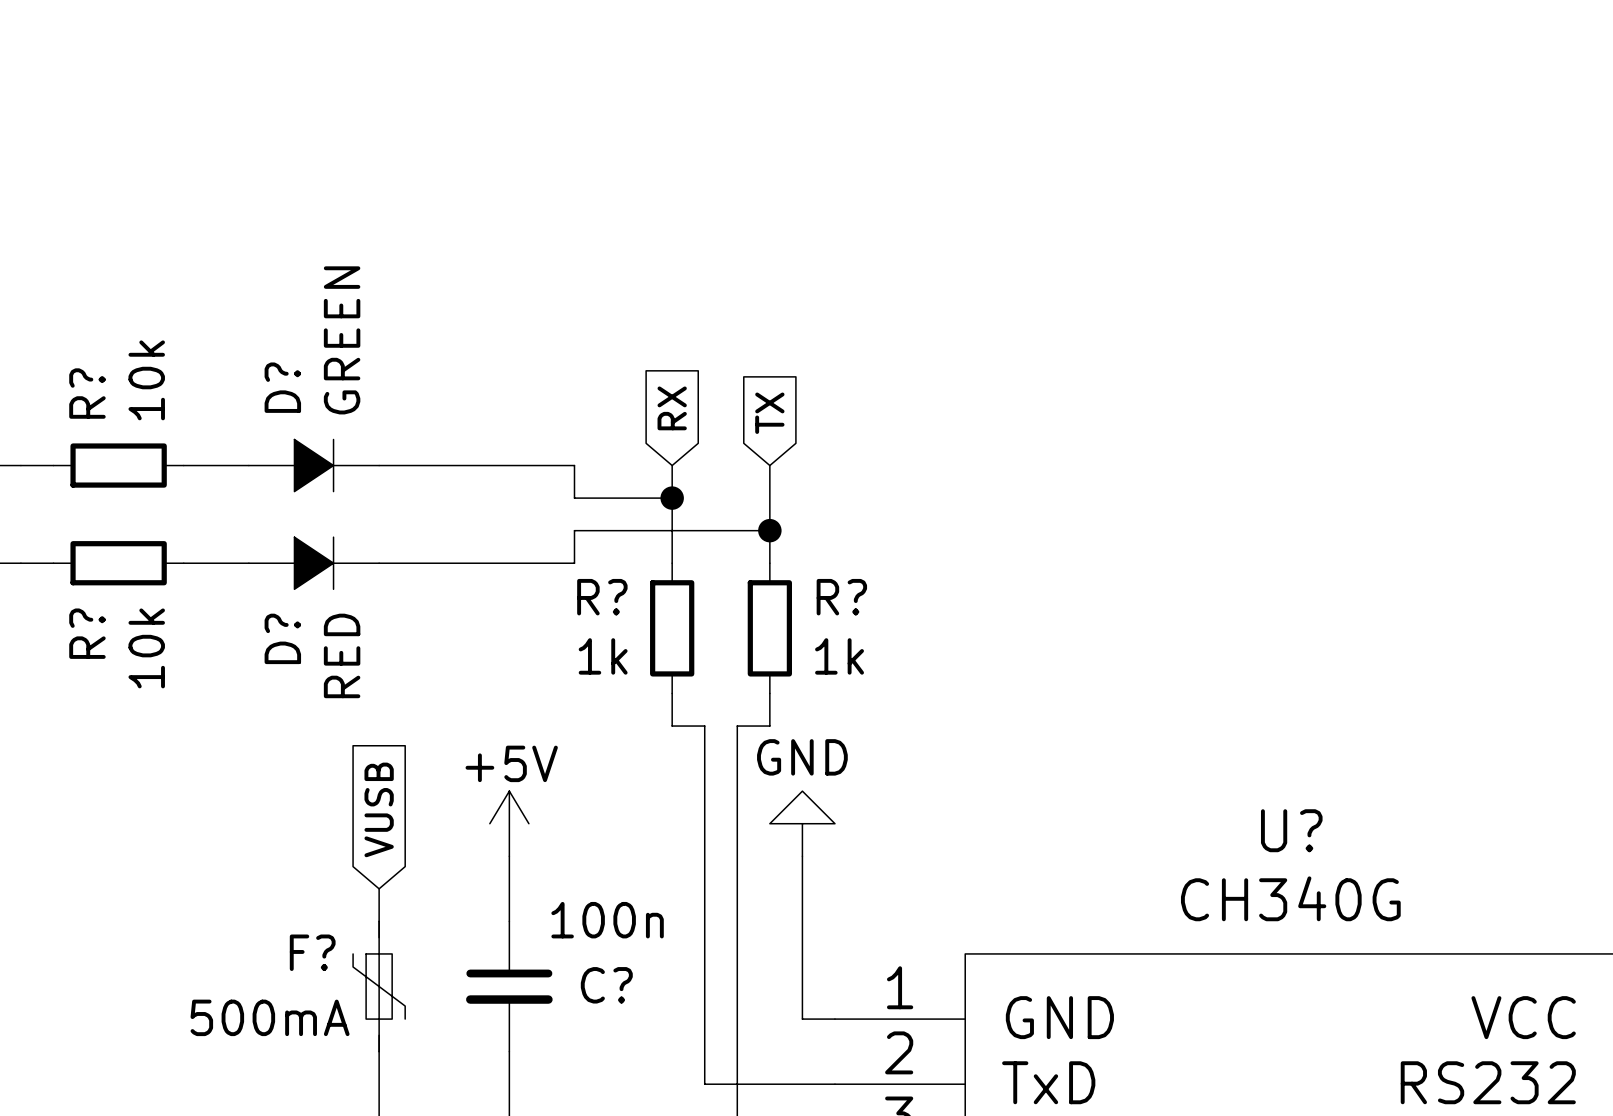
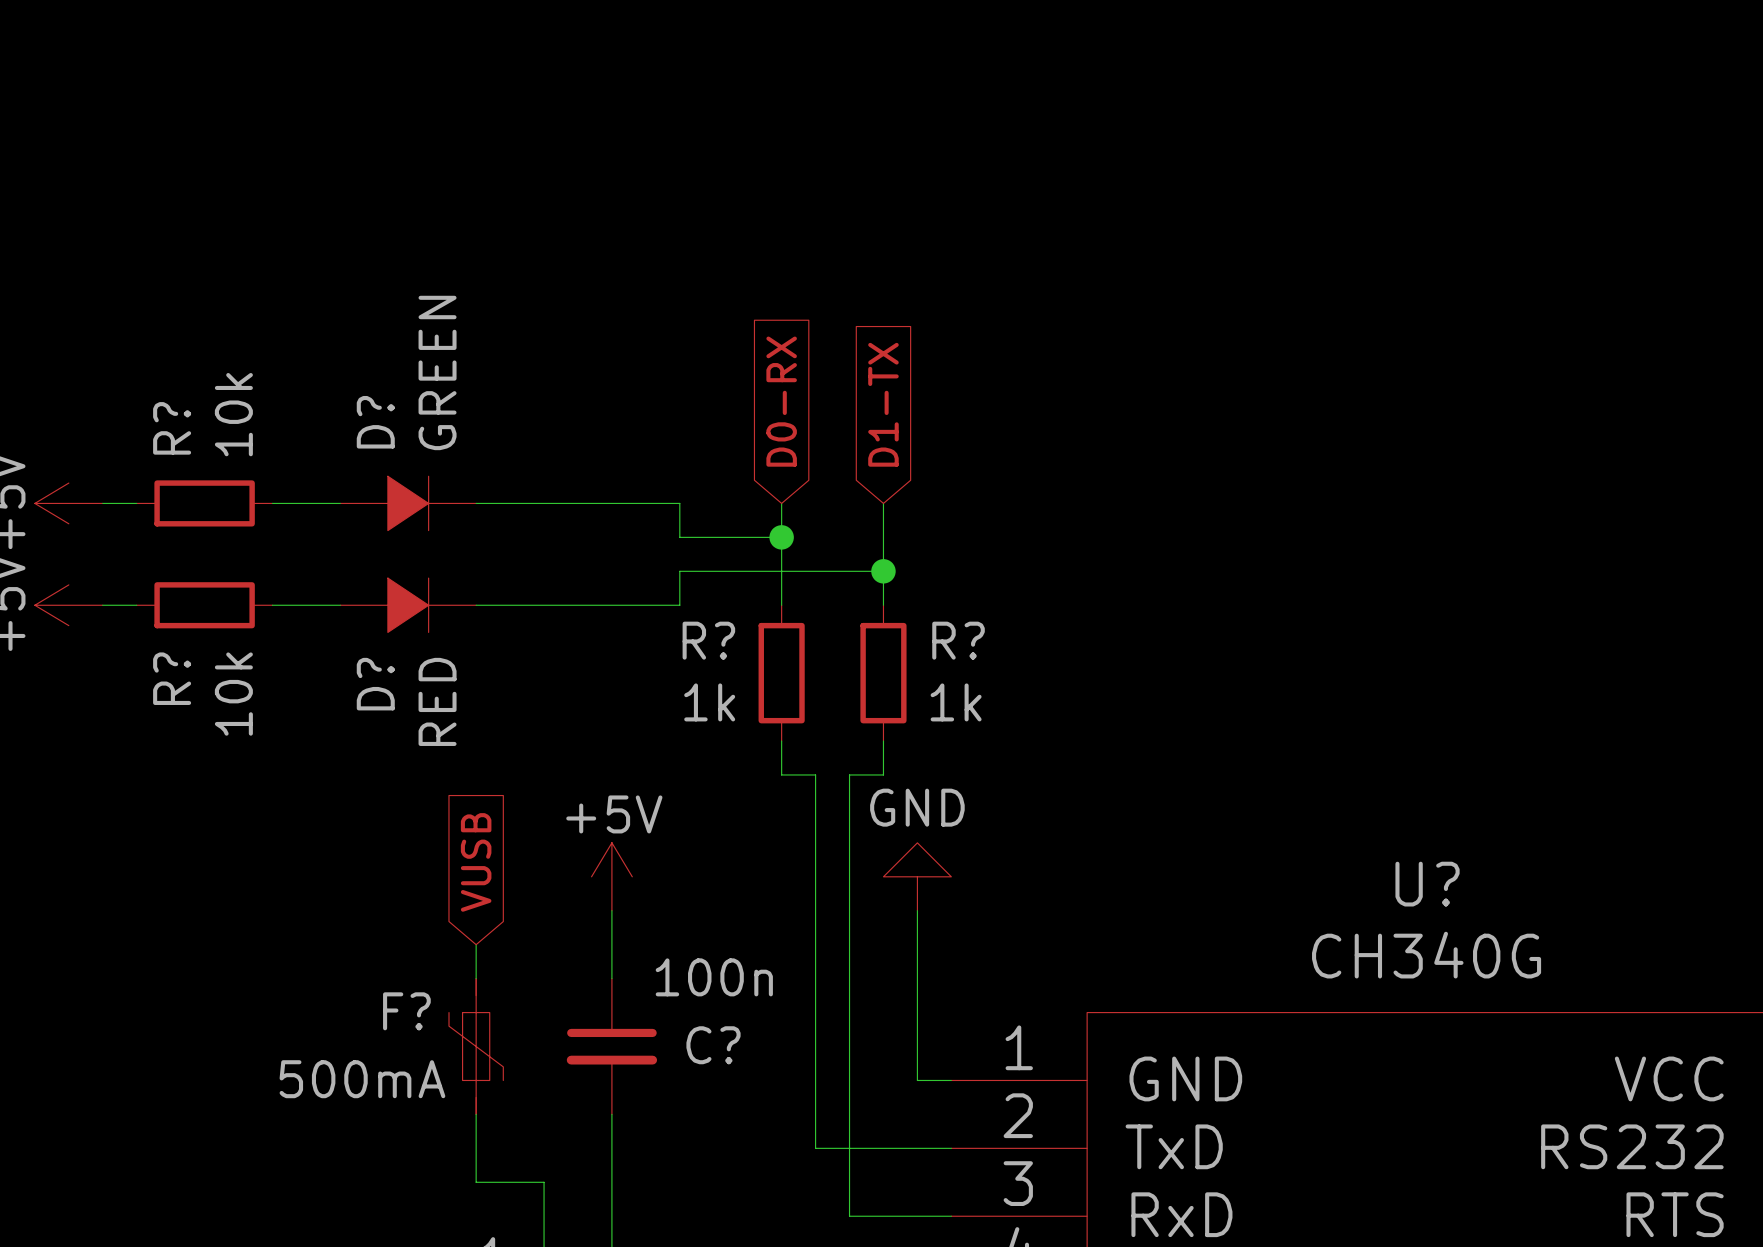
global label: RX (672, 408) -> D0-RX (781, 401)
global label: TX (769, 413) -> D1-TX (883, 404)

